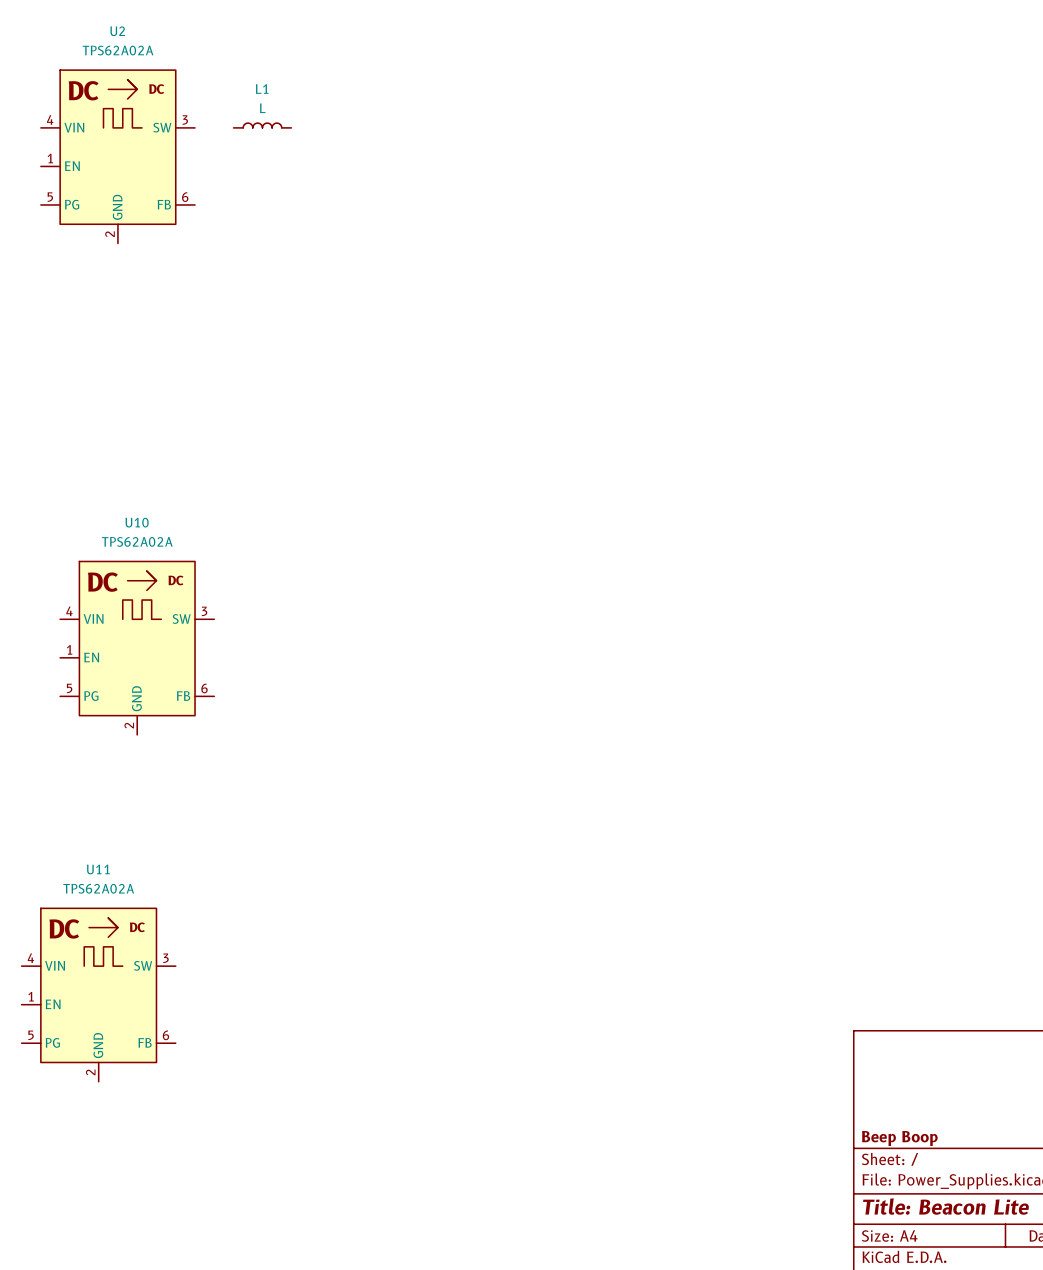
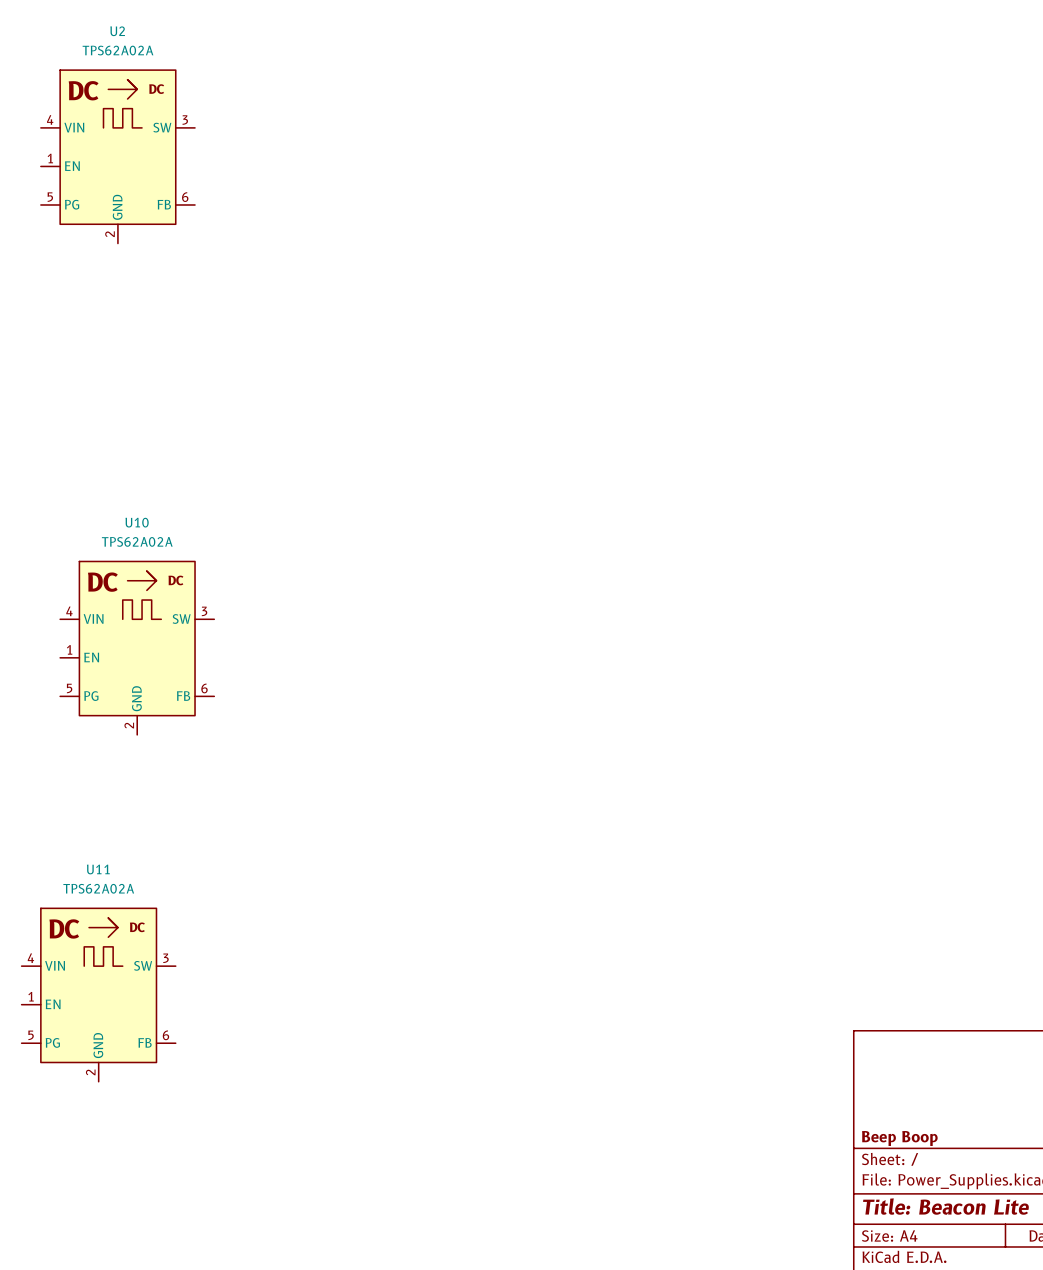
L1: L (262, 125) -> none

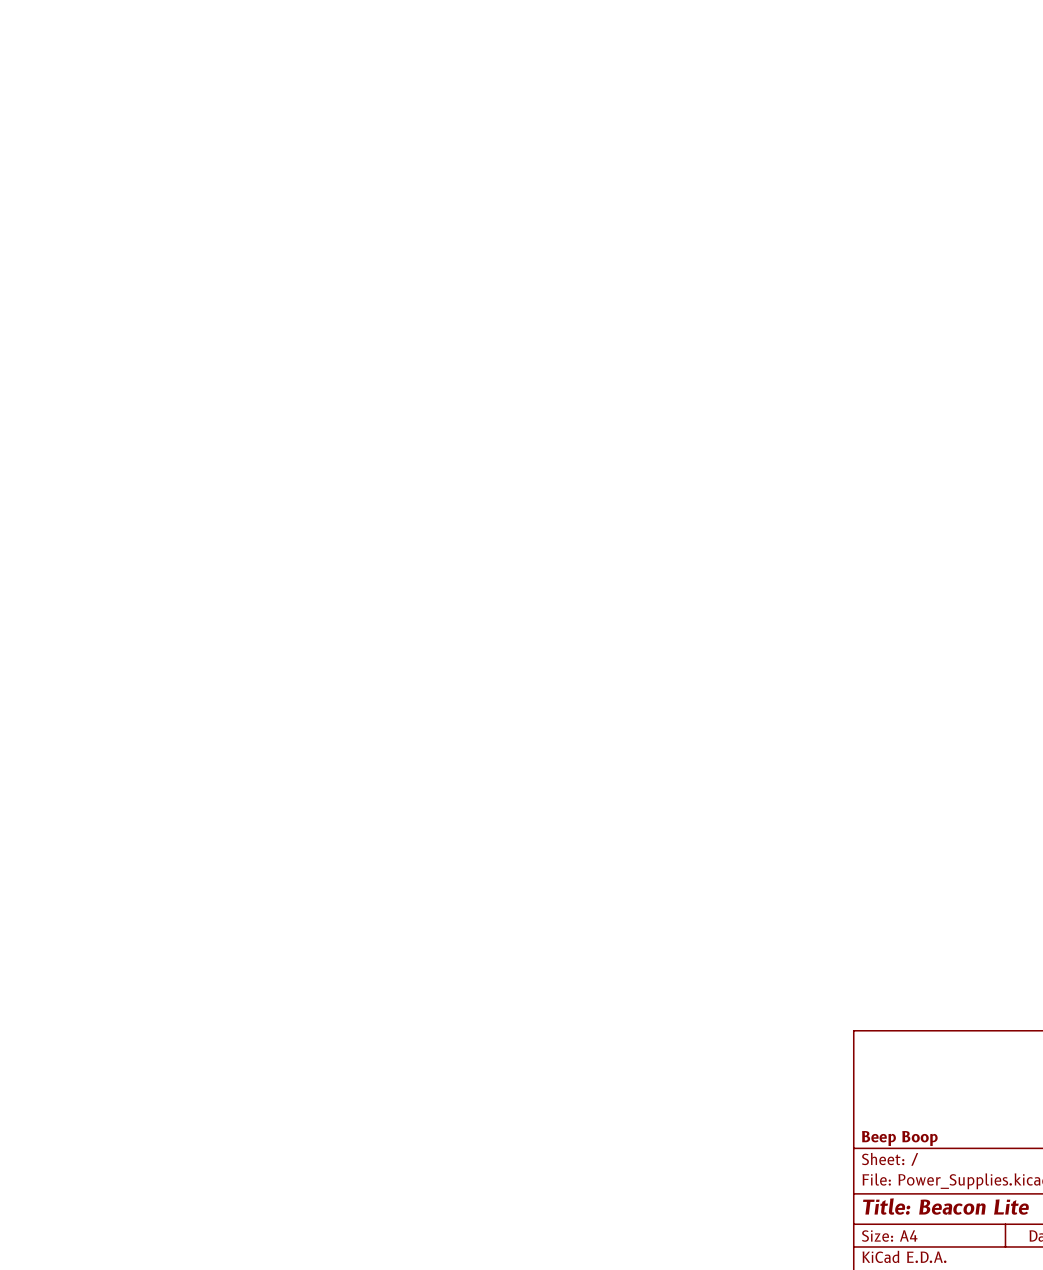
U2: TPS62A02A (117, 156) -> none
U10: TPS62A02A (137, 648) -> none
U11: TPS62A02A (98, 995) -> none

